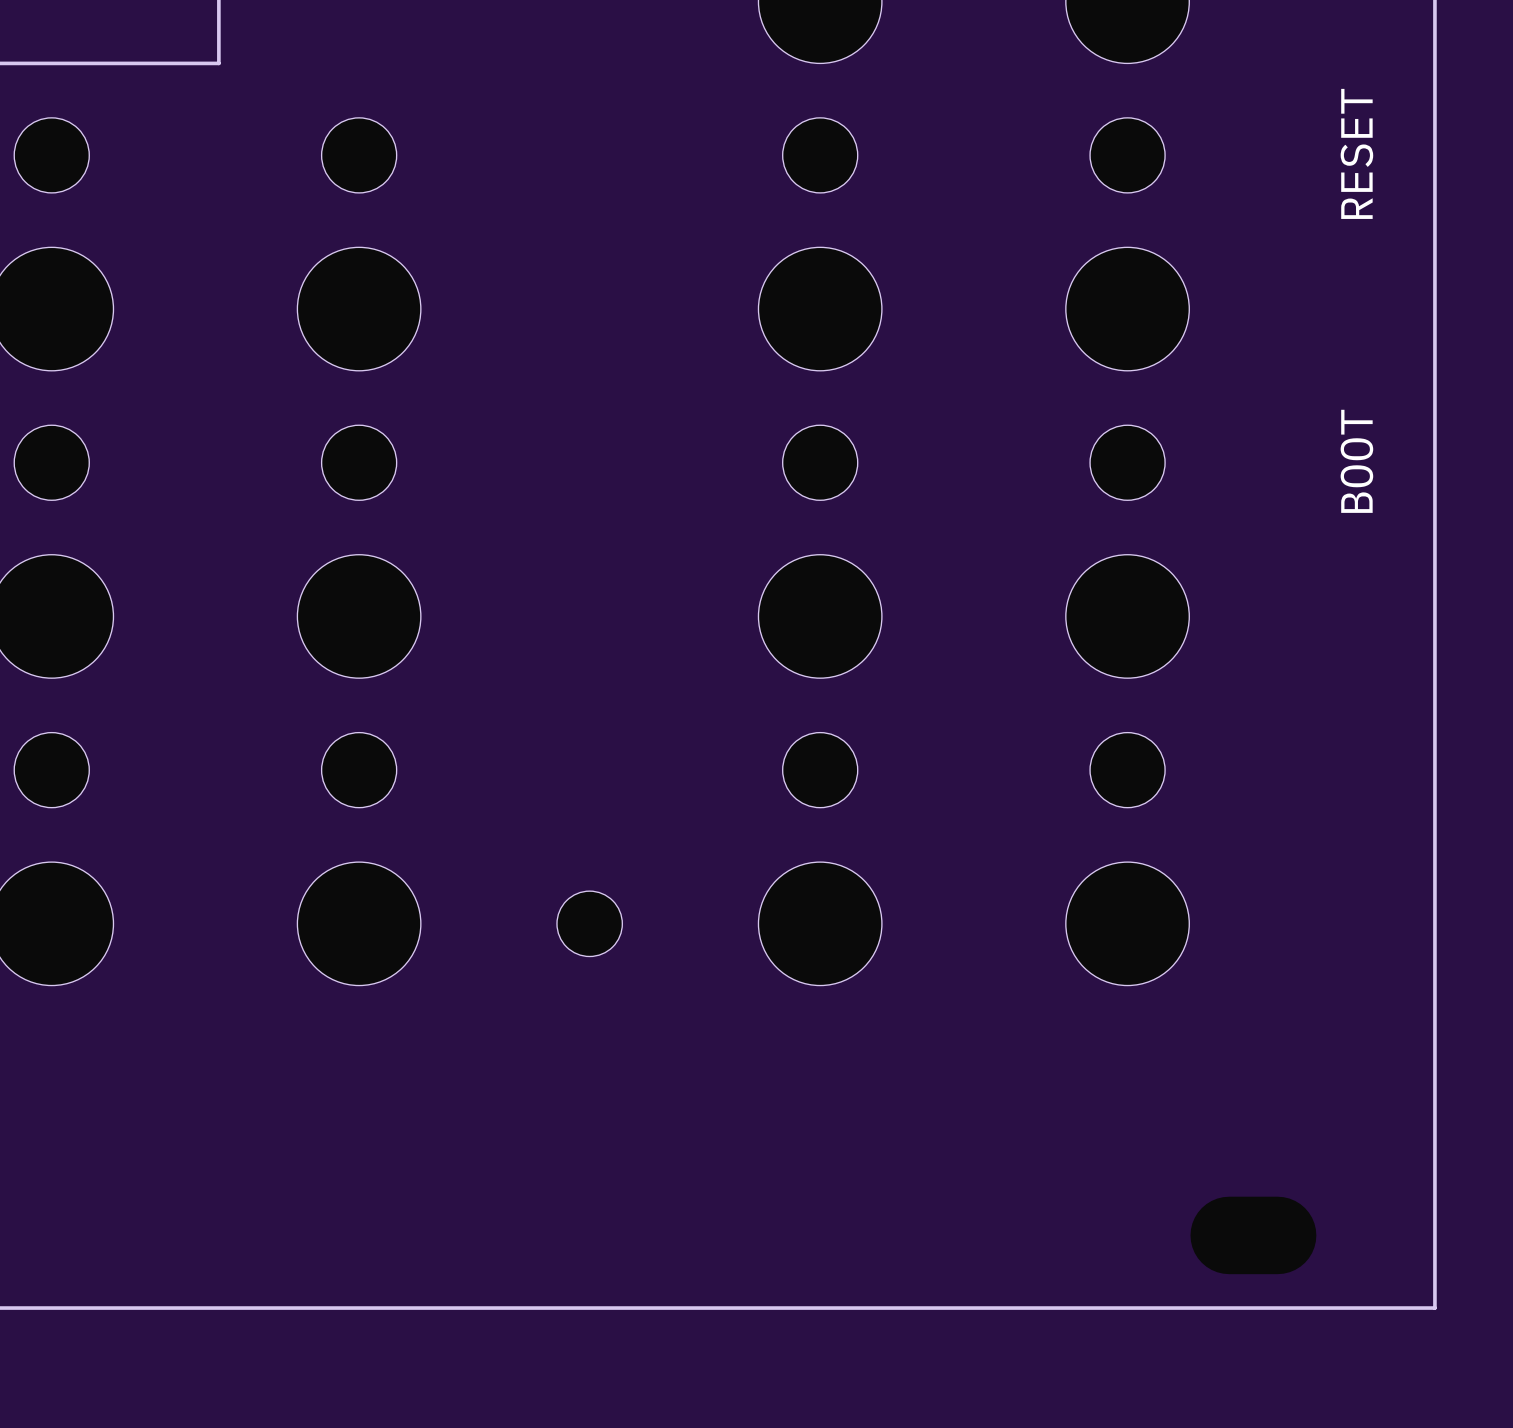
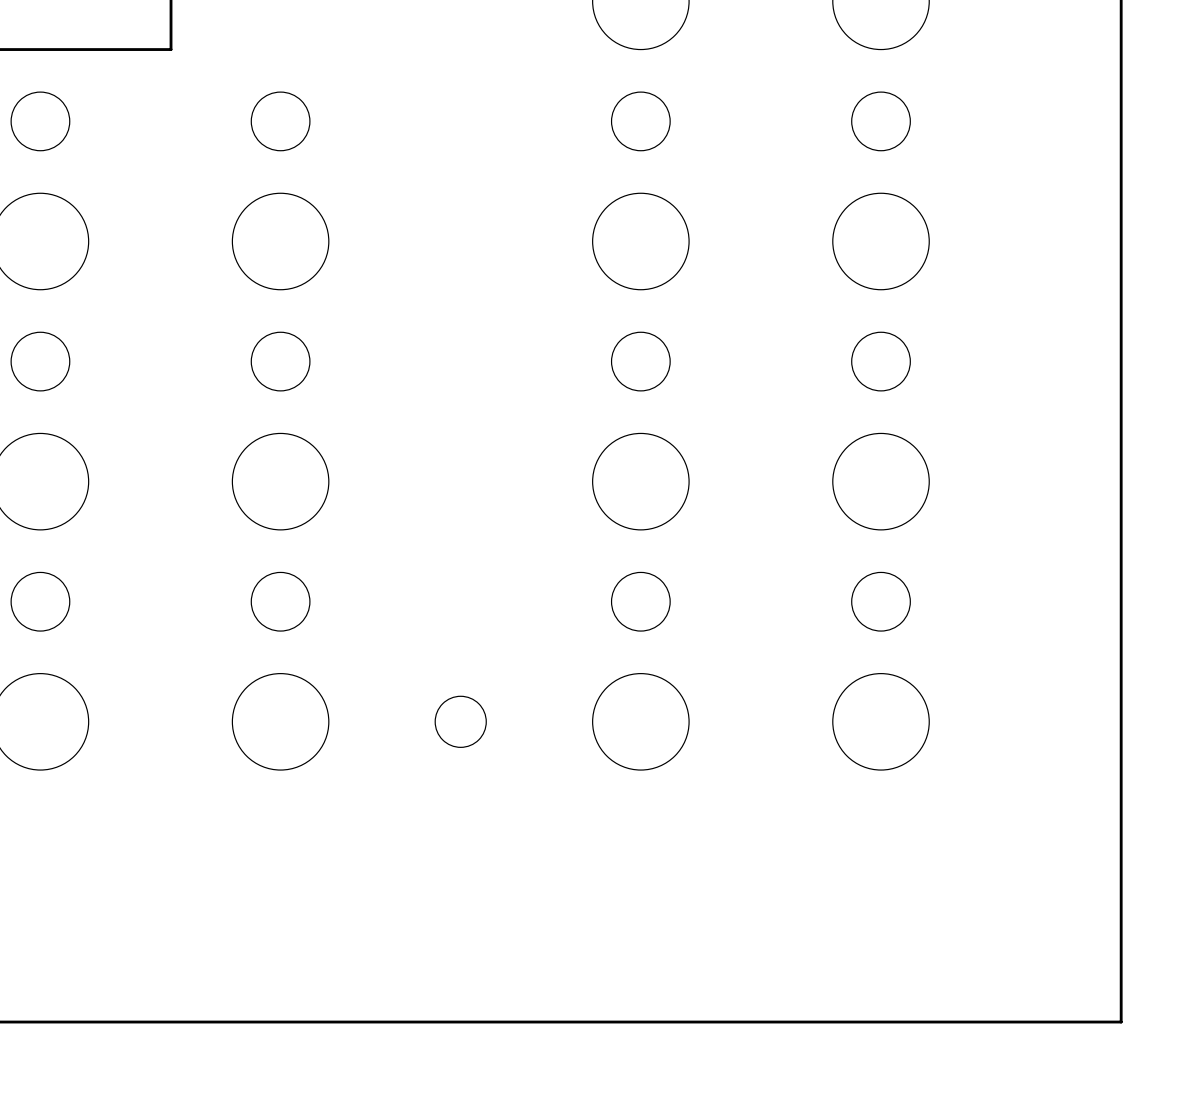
text: RESET (1356, 153) -> none
text: BOOT (1356, 461) -> none

